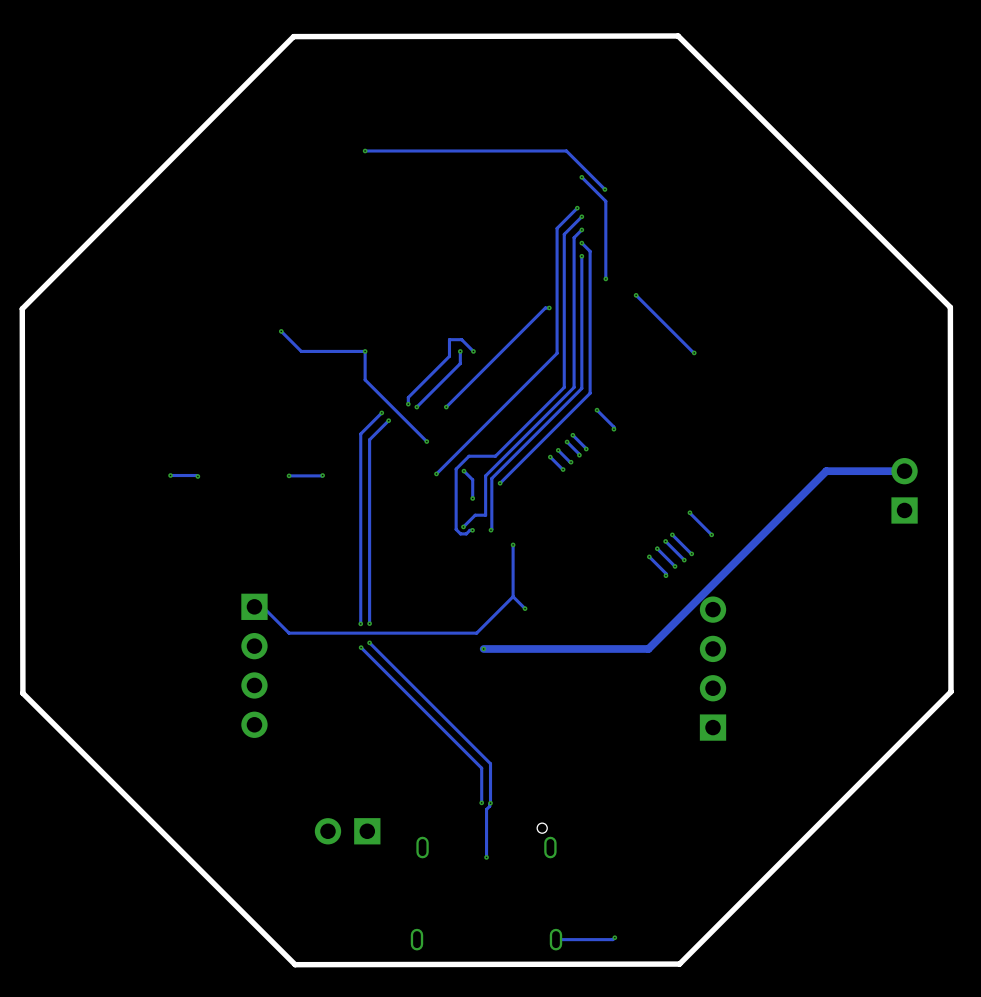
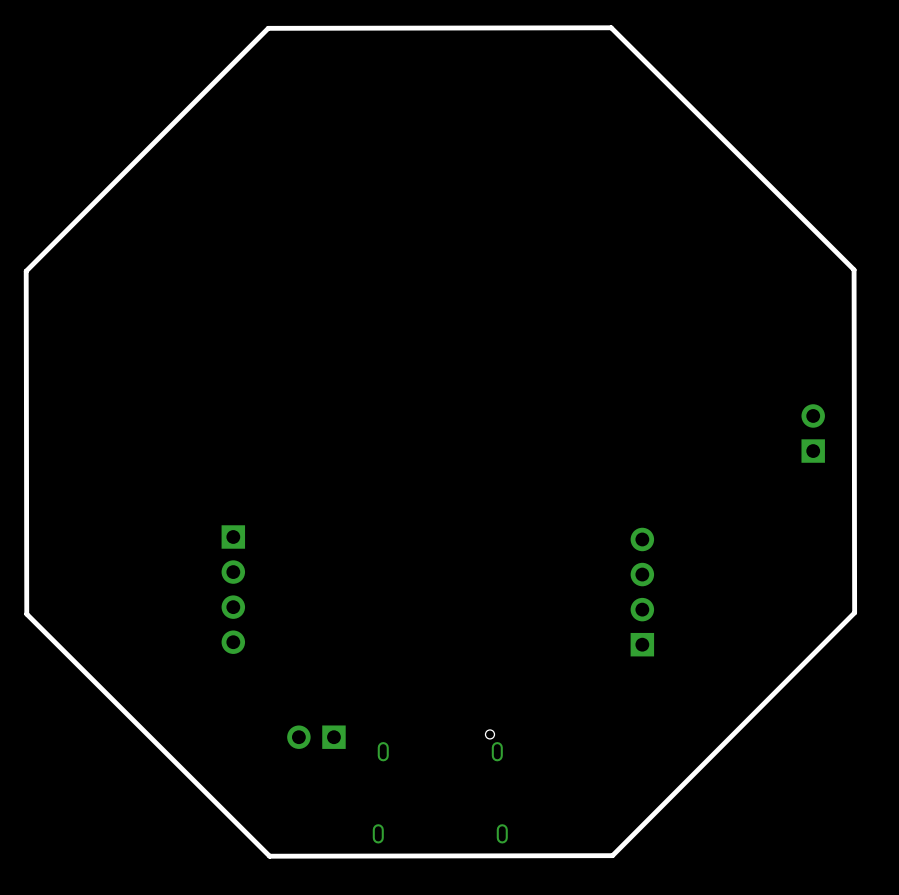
track: (365, 150) (566, 150) (604, 189) -> none
via: (365, 150) -> none
track: (581, 177) (605, 201) (605, 278) -> none
via: (581, 177) -> none
via: (604, 189) -> none
track: (577, 208) (557, 228) (557, 353) (436, 473) -> none
via: (577, 208) -> none
track: (581, 216) (564, 234) (564, 387) (495, 456) (469, 456) (456, 469) (456, 529) (460, 533) (466, 533) (472, 530) -> none
via: (581, 216) -> none
track: (581, 229) (574, 237) (574, 387) (485, 475) (485, 515) (475, 515) (463, 526) -> none
via: (581, 229) -> none
track: (581, 243) (590, 251) (590, 393) (500, 483) -> none
via: (581, 243) -> none
track: (581, 256) (581, 388) (491, 478) (490, 530) -> none
via: (581, 256) -> none
via: (605, 278) -> none
track: (636, 295) (694, 352) -> none
via: (636, 295) -> none
track: (549, 308) (545, 308) (446, 407) -> none
via: (549, 308) -> none
track: (281, 331) (301, 351) (365, 351) (365, 379) (426, 441) -> none
via: (281, 331) -> none
via: (365, 351) -> none
track: (460, 351) (460, 363) (416, 407) -> none
via: (460, 351) -> none
track: (473, 351) (461, 339) (449, 339) (449, 356) (408, 397) (408, 404) -> none
via: (473, 351) -> none
via: (694, 352) -> none
via: (408, 404) -> none
via: (416, 407) -> none
via: (446, 407) -> none
track: (597, 410) (613, 429) -> none
via: (597, 410) -> none
track: (381, 412) (360, 433) (360, 623) -> none
via: (381, 412) -> none
track: (388, 420) (369, 439) (369, 623) -> none
via: (388, 420) -> none
via: (613, 429) -> none
track: (572, 435) (586, 449) -> none
via: (572, 435) -> none
via: (426, 441) -> none
track: (567, 441) (579, 455) -> none
via: (567, 441) -> none
via: (586, 449) -> none
track: (558, 450) (571, 462) -> none
via: (558, 450) -> none
via: (579, 455) -> none
track: (550, 457) (563, 469) -> none
via: (550, 457) -> none
via: (571, 462) -> none
via: (563, 469) -> none
track: (463, 471) (472, 479) (472, 498) -> none
via: (463, 471) -> none
track: (904, 471) (826, 471) (648, 648) (483, 648) -> none
via: (436, 473) -> none
track: (170, 475) (197, 476) -> none
via: (170, 475) -> none
via: (289, 475) -> none
track: (322, 475) (289, 475) -> none
via: (322, 475) -> none
via: (197, 476) -> none
via: (500, 483) -> none
via: (472, 498) -> none
track: (689, 512) (711, 534) -> none
via: (689, 512) -> none
via: (463, 526) -> none
via: (472, 530) -> none
via: (490, 530) -> none
track: (672, 534) (691, 553) -> none
via: (672, 534) -> none
via: (711, 534) -> none
track: (665, 541) (684, 560) -> none
via: (665, 541) -> none
track: (513, 544) (513, 596) -> none
via: (513, 544) -> none
track: (657, 548) (675, 566) -> none
via: (657, 548) -> none
via: (691, 553) -> none
track: (649, 556) (665, 575) -> none
via: (649, 556) -> none
via: (684, 560) -> none
via: (675, 566) -> none
via: (665, 575) -> none
track: (513, 596) (476, 633) (289, 633) (262, 606) (254, 606) -> none
track: (513, 596) (525, 608) -> none
via: (525, 608) -> none
via: (360, 623) -> none
via: (369, 623) -> none
track: (369, 642) (490, 763) (490, 803) (486, 809) (486, 857) -> none
via: (369, 642) -> none
track: (361, 647) (481, 768) (481, 802) -> none
via: (361, 647) -> none
via: (483, 648) -> none
via: (481, 802) -> none
via: (490, 803) -> none
via: (486, 857) -> none
track: (614, 937) (612, 939) (555, 939) -> none
via: (614, 937) -> none

